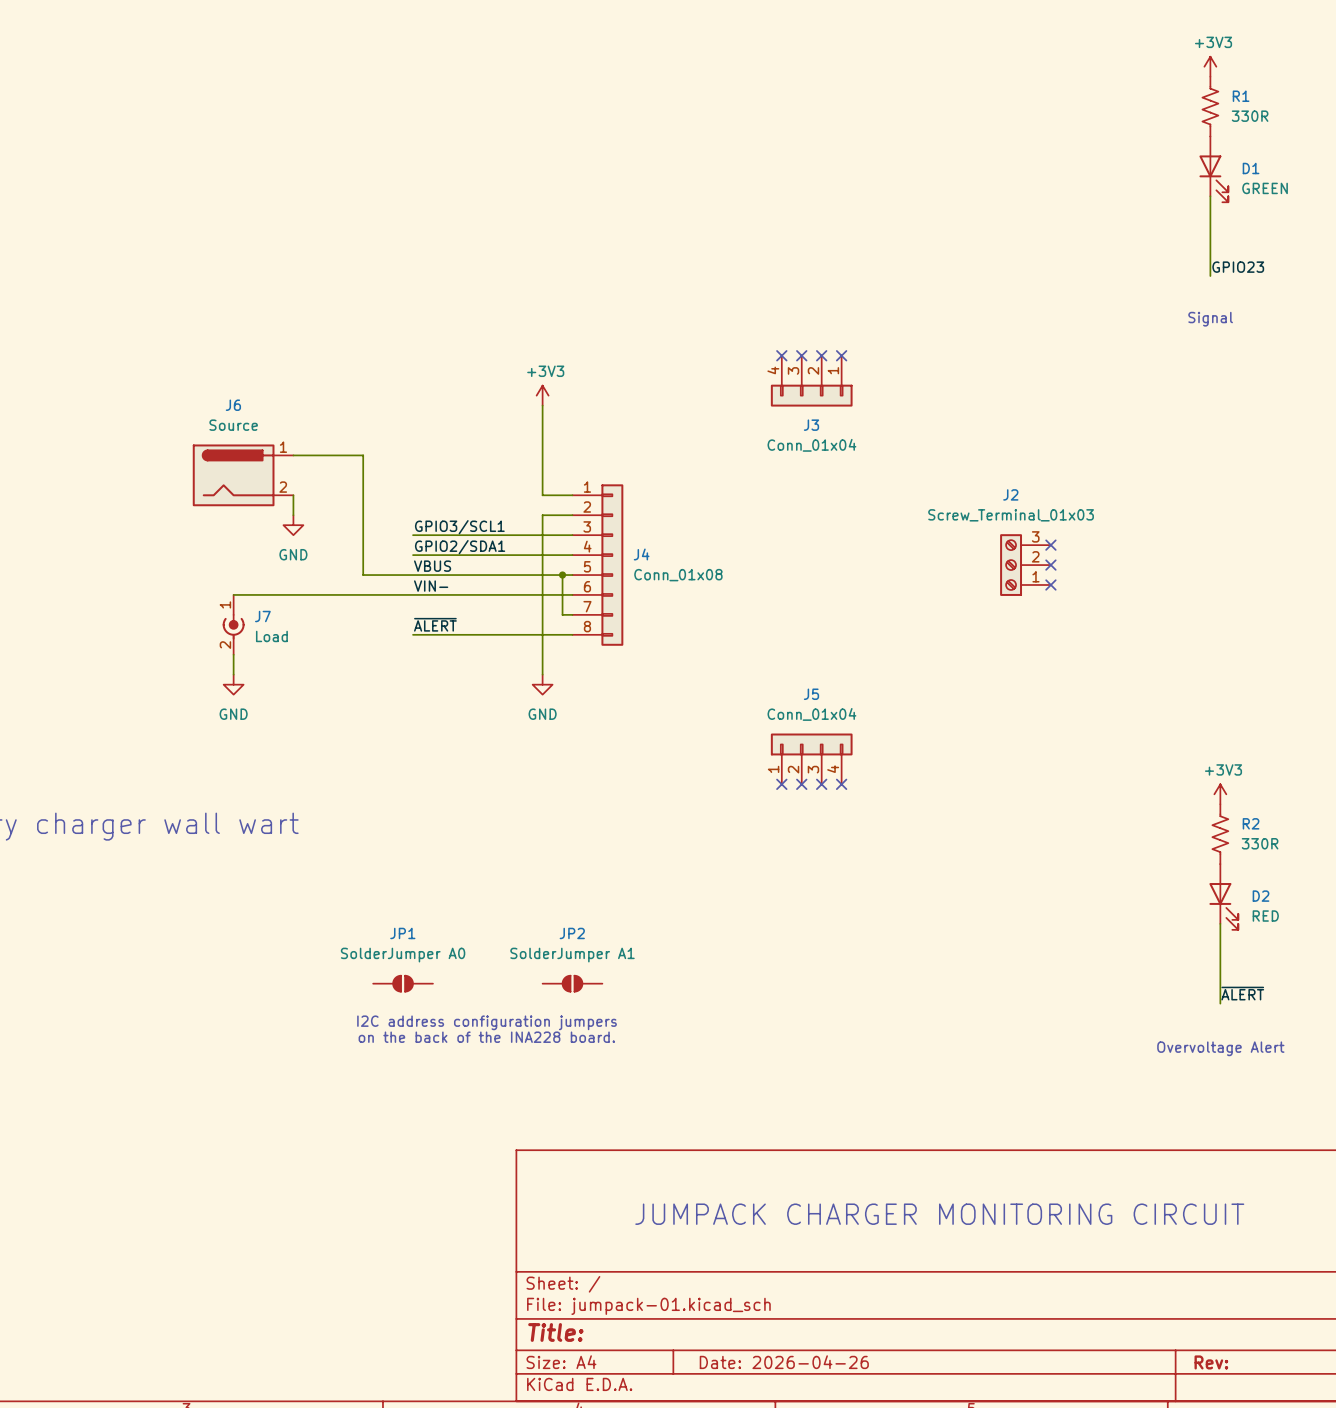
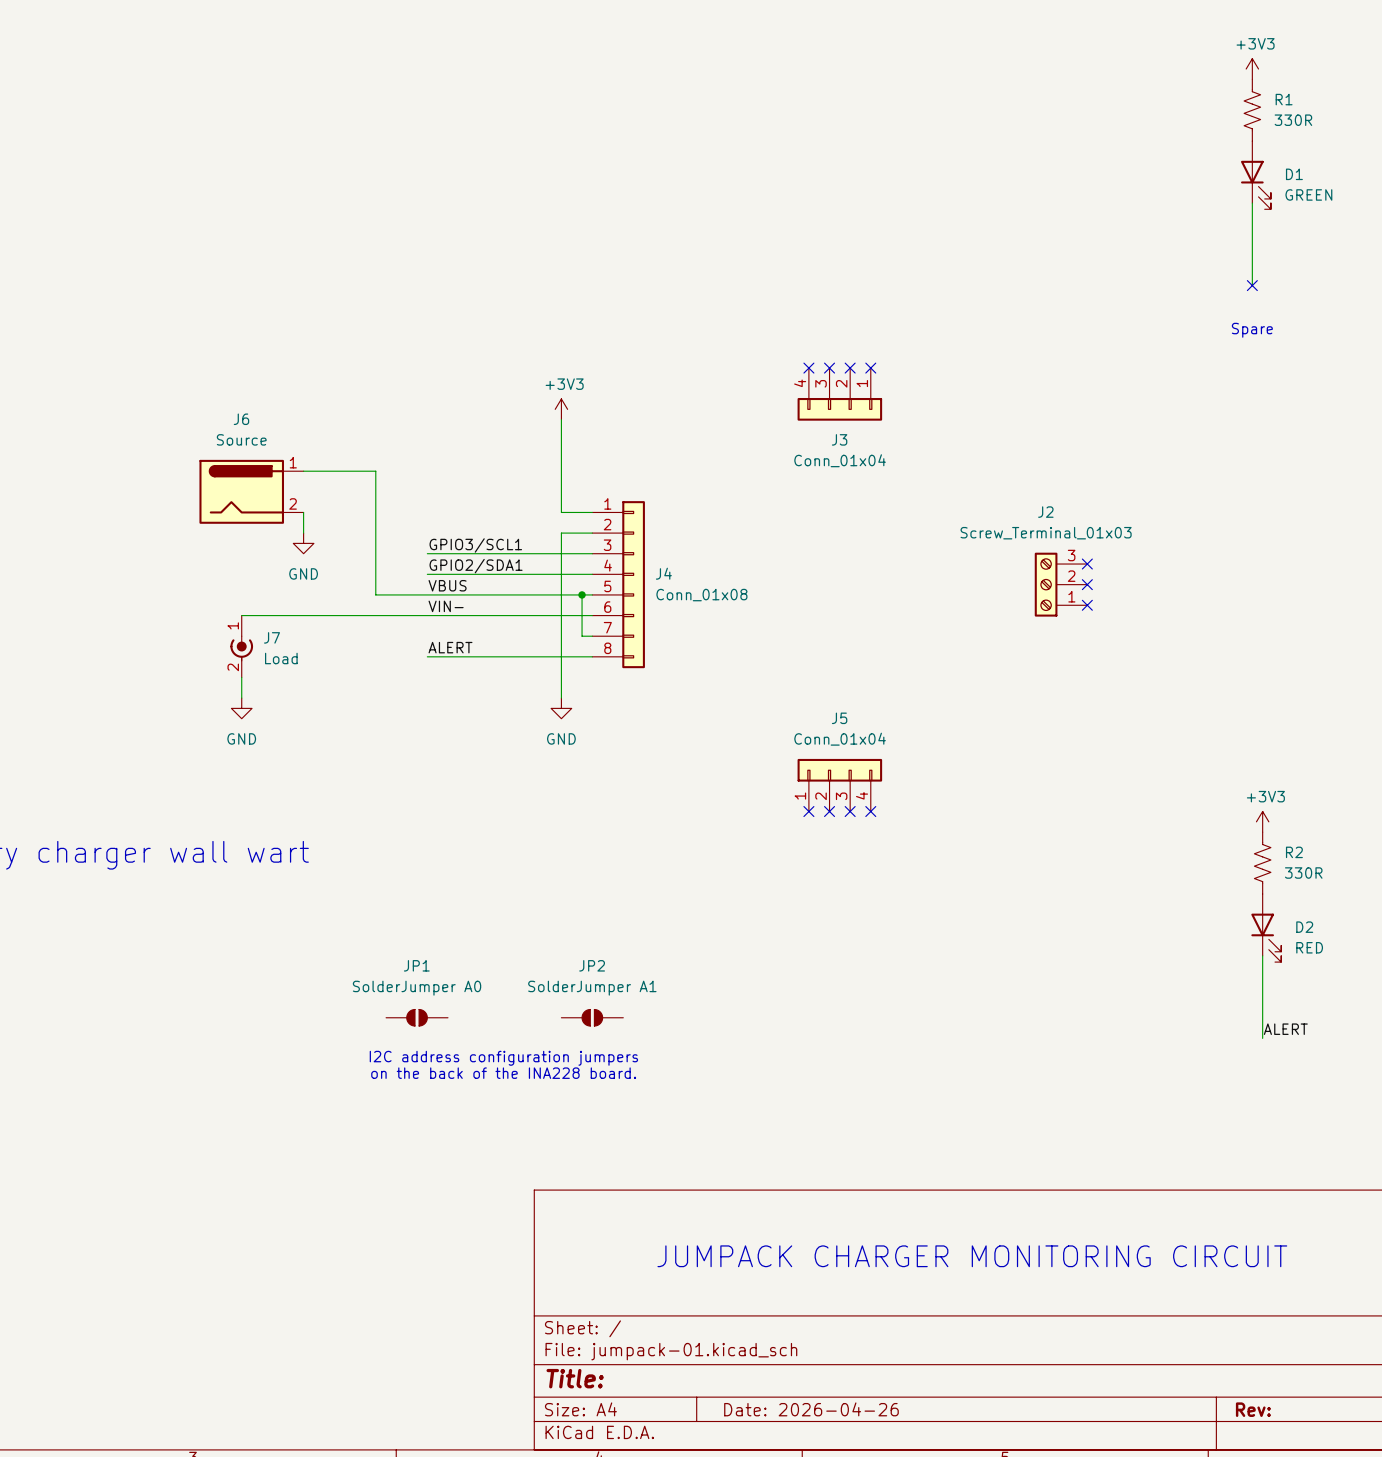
label: GPIO23 (1238, 267) -> none
no-connect mark: none -> (1252, 285)
text: Signal (1210, 319) -> Spare (1252, 330)
label: ~{ALERT} (435, 624) -> ALERT (450, 647)
label: ~{ALERT} (1242, 993) -> ALERT (1285, 1029)
text: Overvoltage Alert (1220, 1048) -> none

